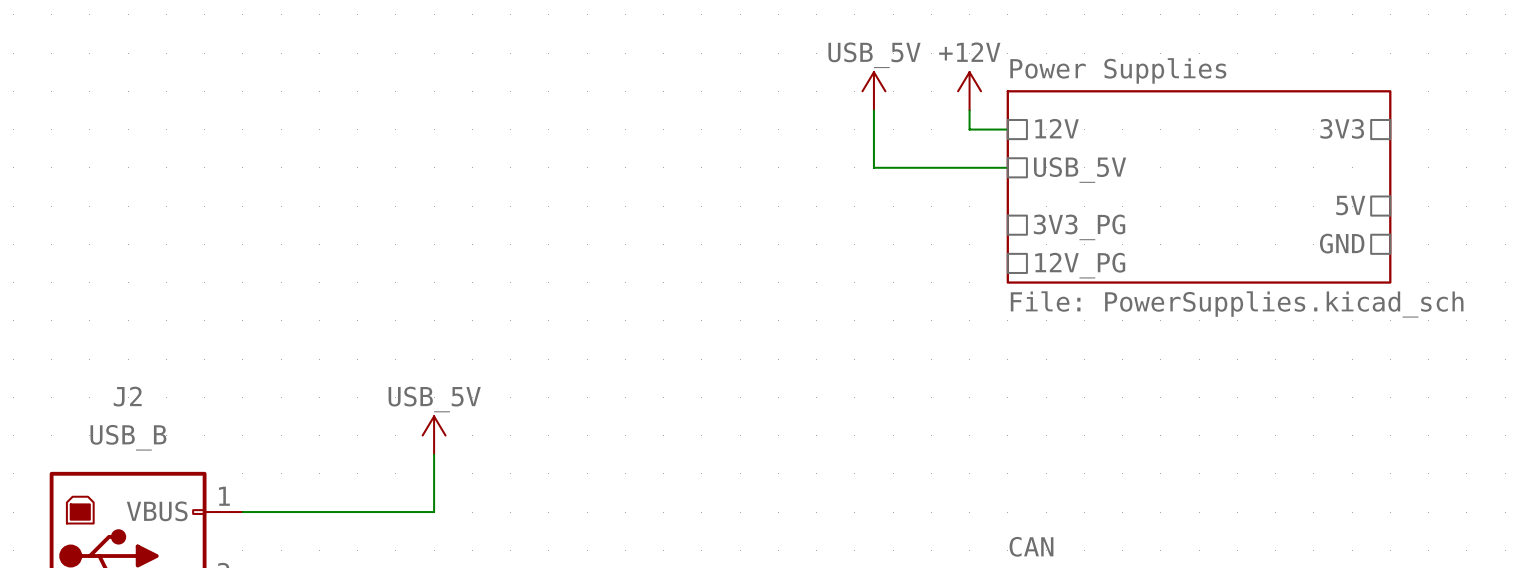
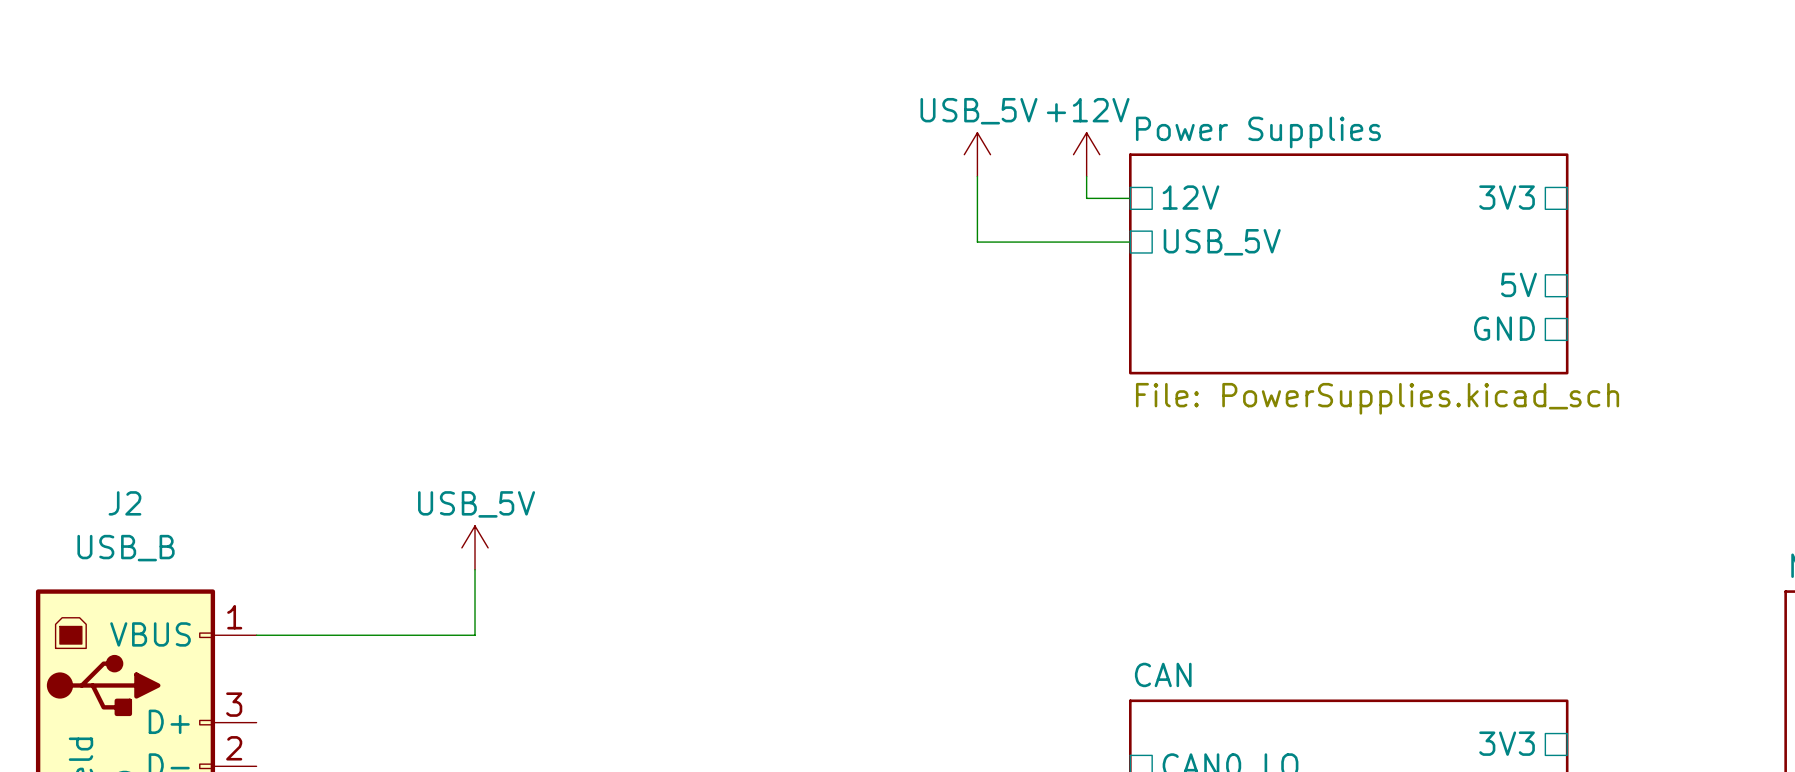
sheet pin: 3V3_PG (1079, 227) -> none
sheet pin: 12V_PG (1080, 265) -> none

